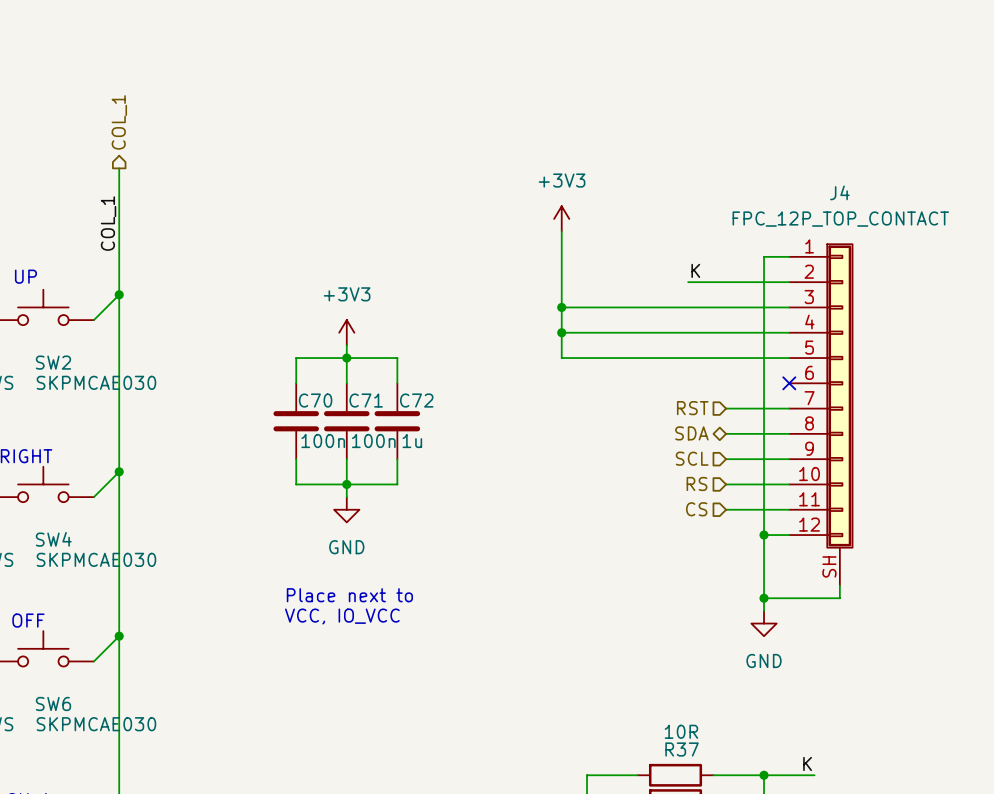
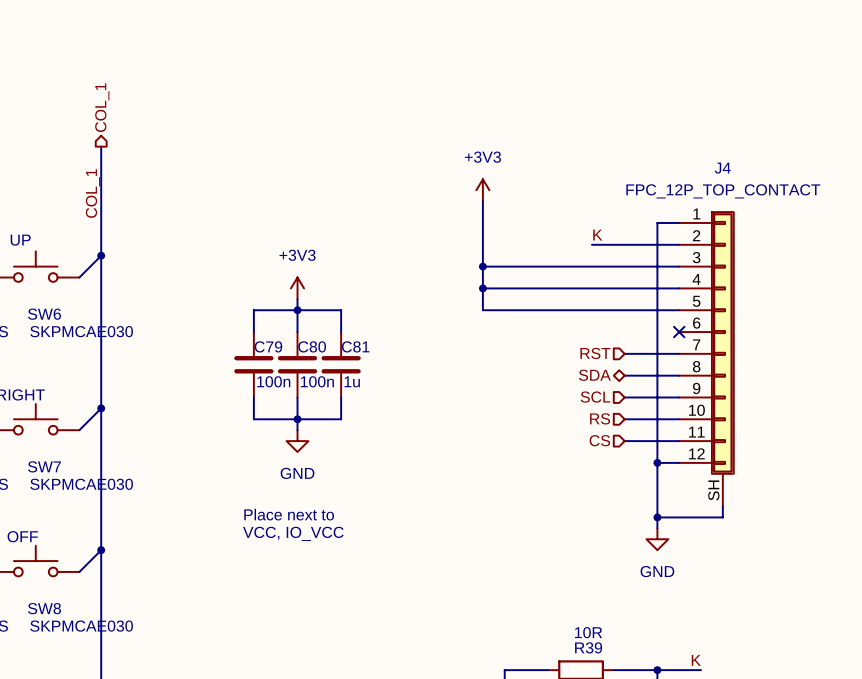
SW2 name: SW2 (53, 362) -> SW6 (44, 314)
C70 name: C70 (315, 400) -> C79 (268, 346)
C71 name: C71 (366, 400) -> C80 (312, 346)
C72 name: C72 (416, 400) -> C81 (355, 346)
SW4 name: SW4 (53, 539) -> SW7 (44, 466)
SW6 name: SW6 (53, 703) -> SW8 (44, 608)
R37 name: R37 (682, 749) -> R39 (588, 647)

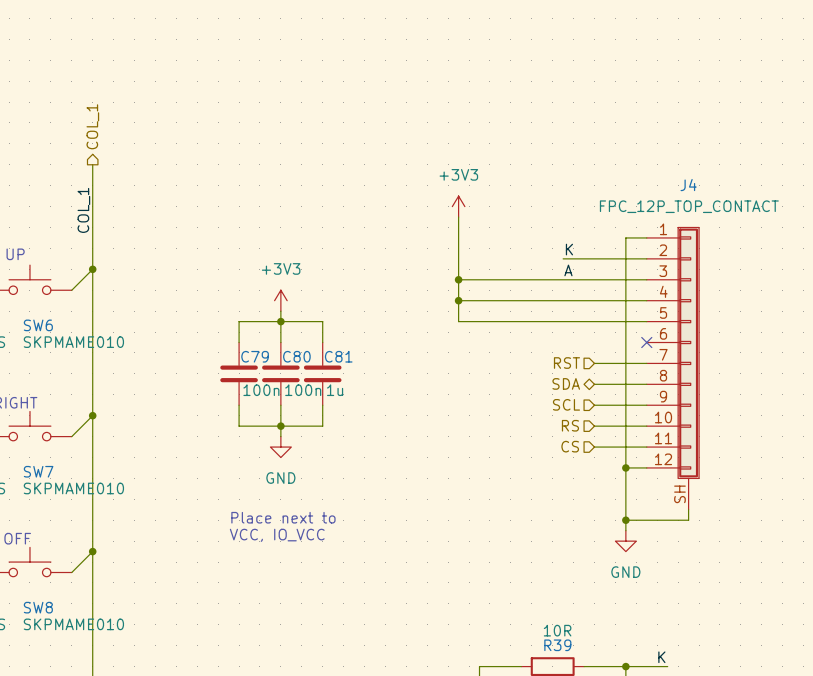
label: none -> A (568, 270)
SW6 value: SKPMCAE030 (81, 331) -> SKPMAME010 (73, 342)
SW7 value: SKPMCAE030 (81, 484) -> SKPMAME010 (73, 488)
SW8 value: SKPMCAE030 (81, 626) -> SKPMAME010 (73, 624)

